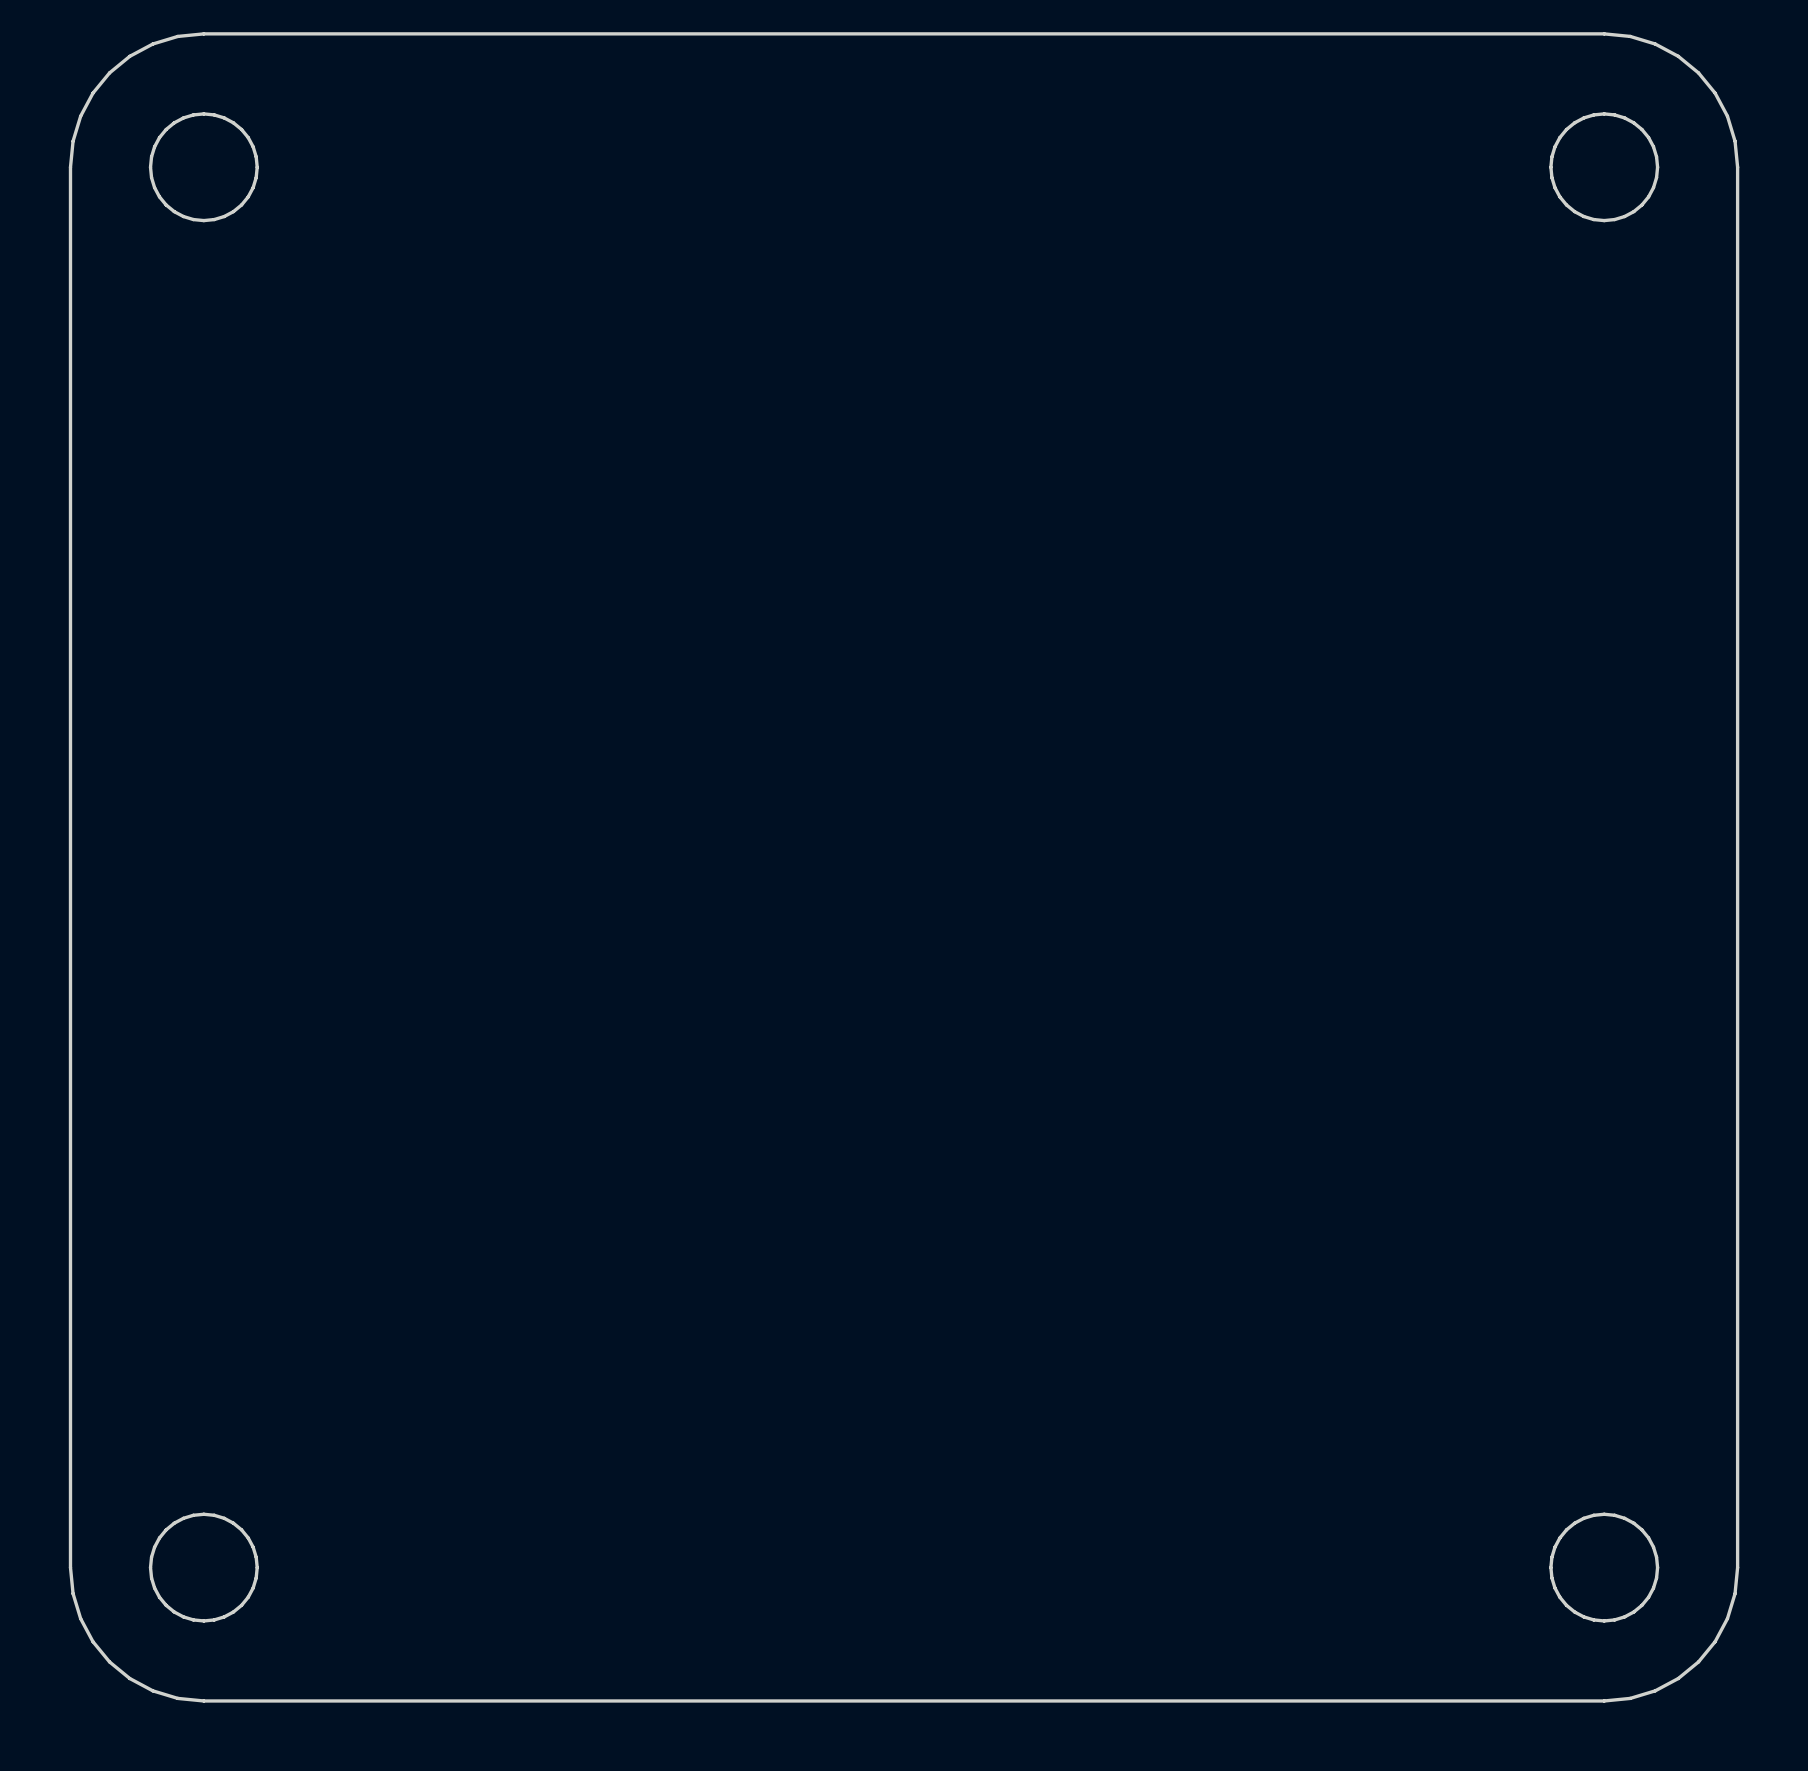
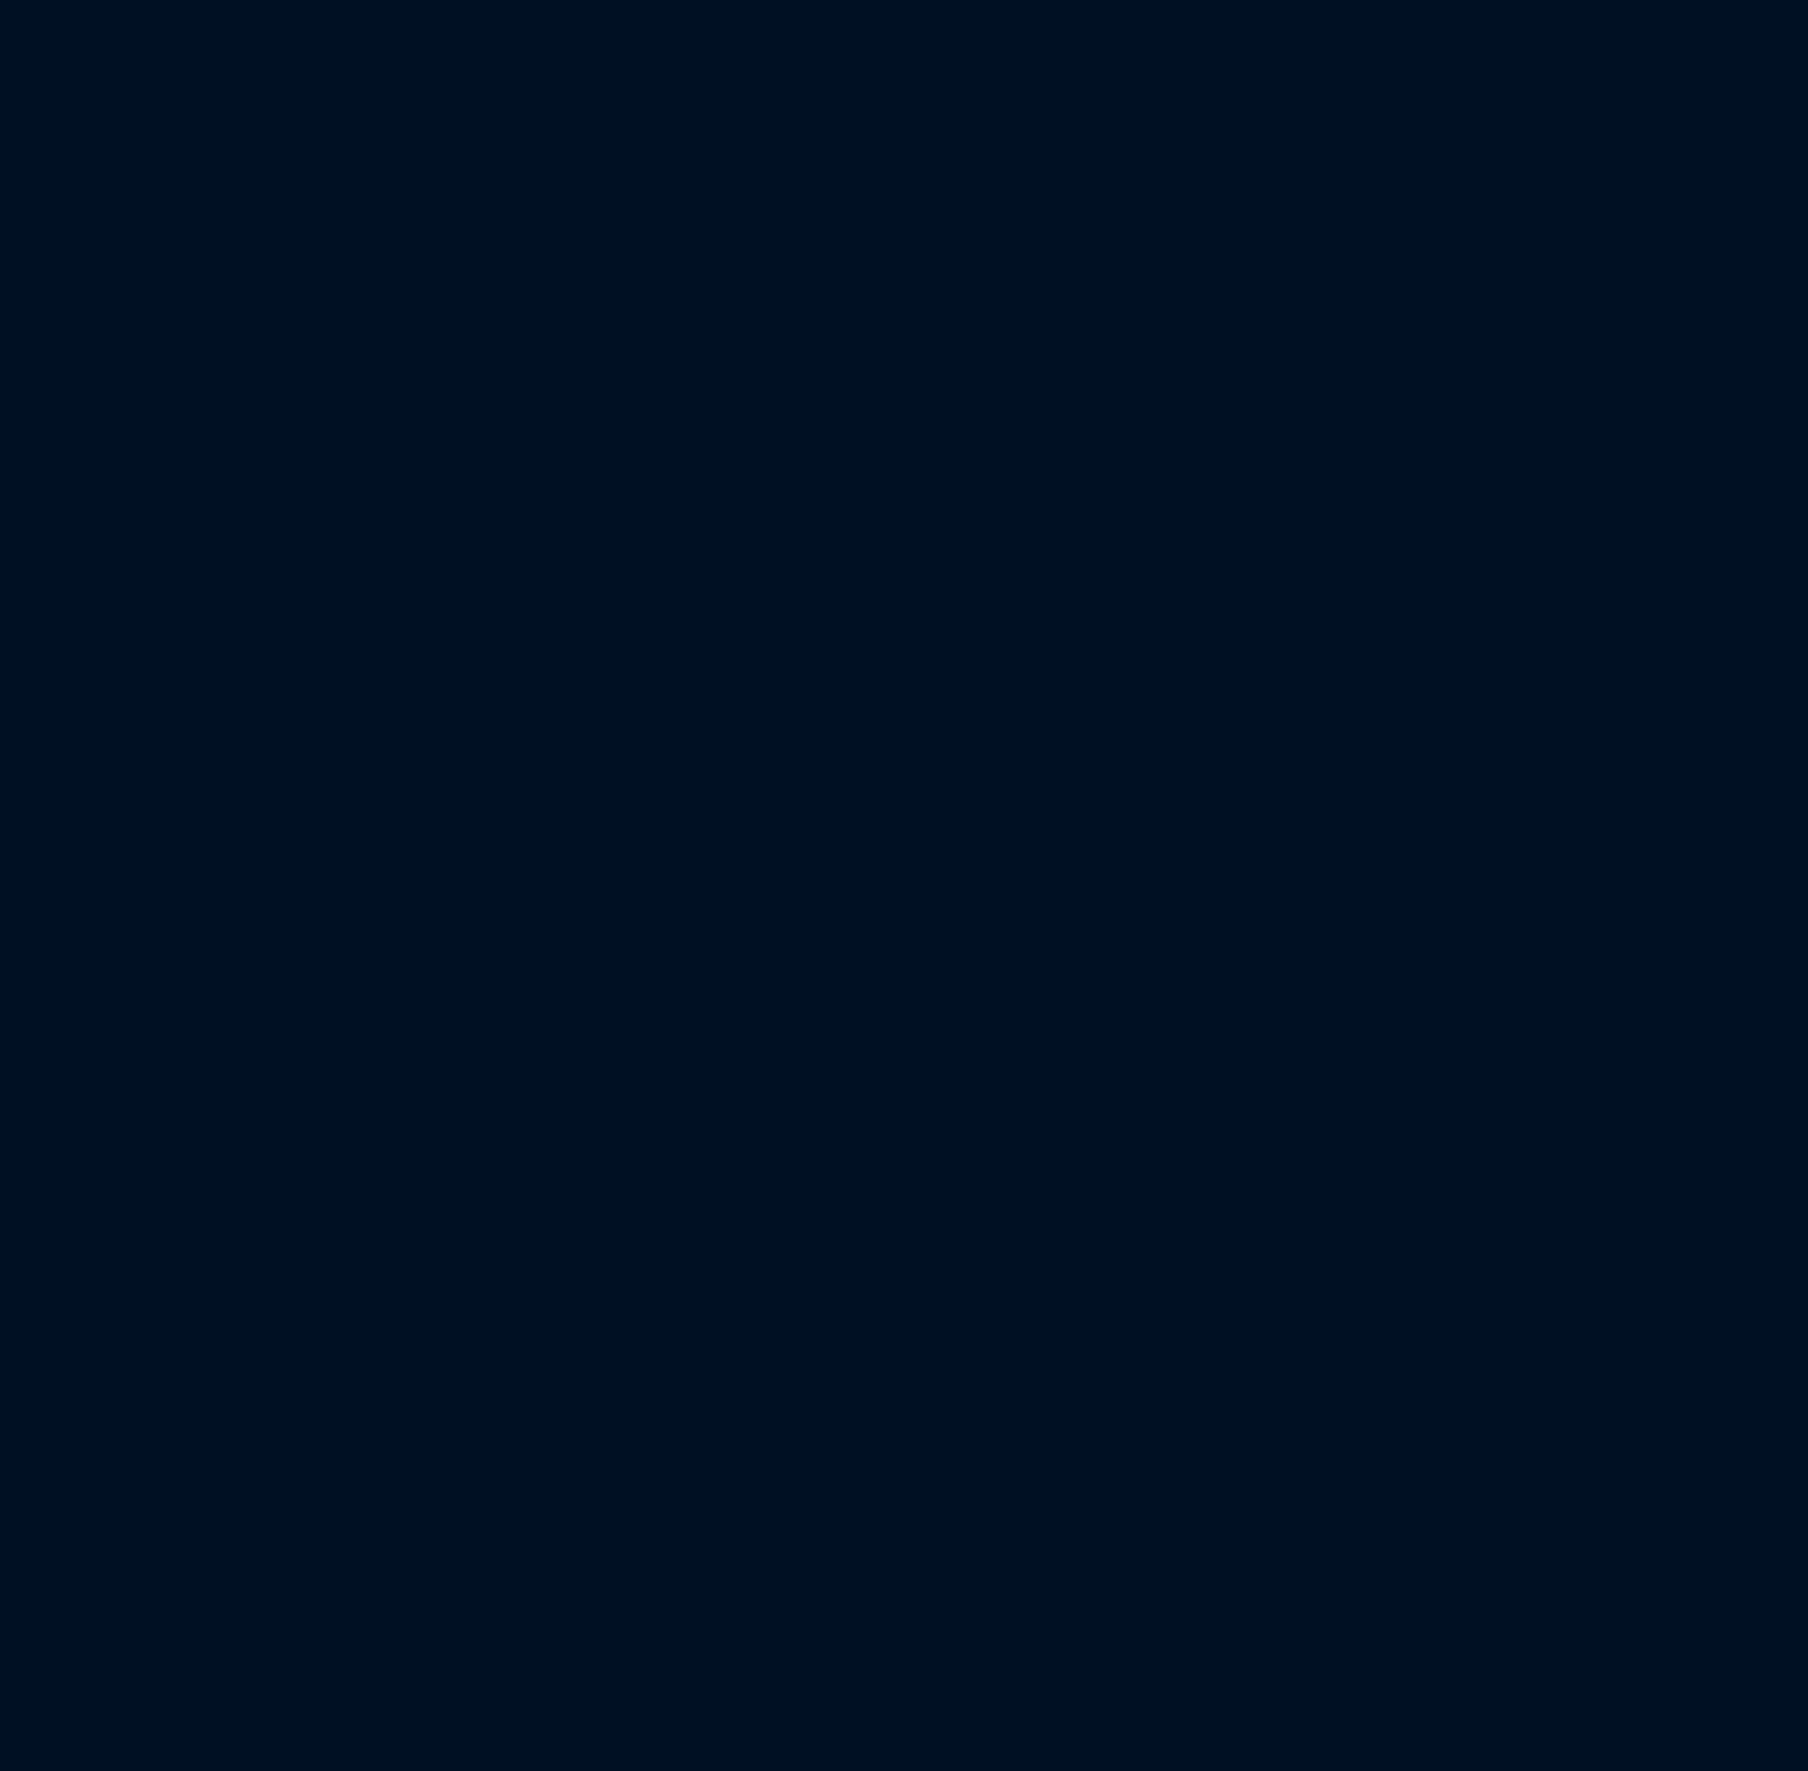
board edge: (1604, 33) (1630, 36) (1655, 44) (1678, 56) (1698, 72) (1715, 93) (1727, 116) (1735, 141) (1737, 167) (1737, 1567) (1735, 1593) (1727, 1618) (1715, 1641) (1698, 1661) (1678, 1678) (1655, 1690) (1630, 1698) (1604, 1700) (203, 1700) (177, 1698) (152, 1690) (129, 1678) (109, 1661) (92, 1641) (80, 1618) (73, 1593) (70, 1567) (70, 167) (73, 141) (80, 116) (92, 93) (109, 72) (129, 56) (152, 44) (177, 36) (203, 33) (1604, 33) -> none
board edge: (203, 113) (183, 117) (166, 129) (154, 146) (150, 167) (154, 187) (166, 204) (183, 216) (203, 220) (224, 216) (241, 204) (253, 187) (257, 167) (253, 146) (241, 129) (224, 117) (203, 113) -> none
board edge: (1604, 113) (1583, 117) (1566, 129) (1554, 146) (1550, 167) (1554, 187) (1566, 204) (1583, 216) (1604, 220) (1624, 216) (1641, 204) (1653, 187) (1657, 167) (1653, 146) (1641, 129) (1624, 117) (1604, 113) -> none
board edge: (203, 1514) (183, 1518) (166, 1529) (154, 1547) (150, 1567) (154, 1588) (166, 1605) (183, 1616) (203, 1620) (224, 1616) (241, 1605) (253, 1588) (257, 1567) (253, 1547) (241, 1529) (224, 1518) (203, 1514) -> none
board edge: (1604, 1514) (1583, 1518) (1566, 1529) (1554, 1547) (1550, 1567) (1554, 1588) (1566, 1605) (1583, 1616) (1604, 1620) (1624, 1616) (1641, 1605) (1653, 1588) (1657, 1567) (1653, 1547) (1641, 1529) (1624, 1518) (1604, 1514) -> none

